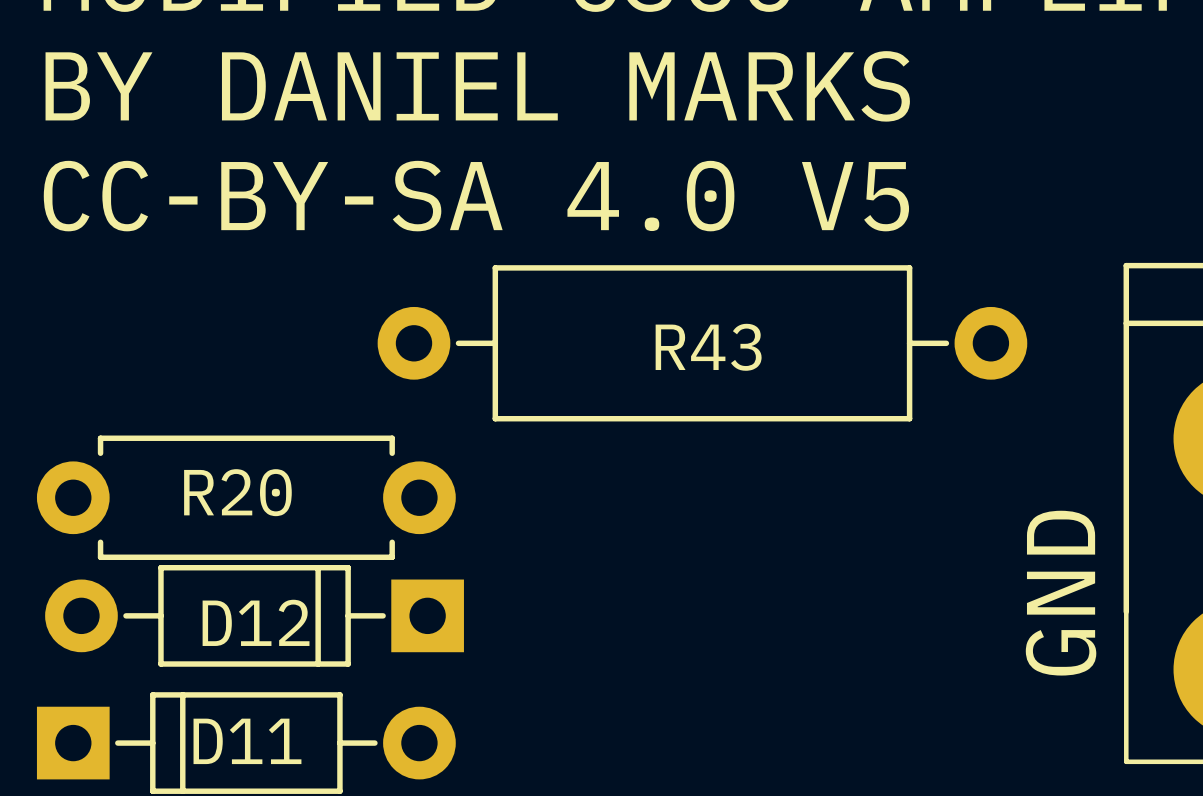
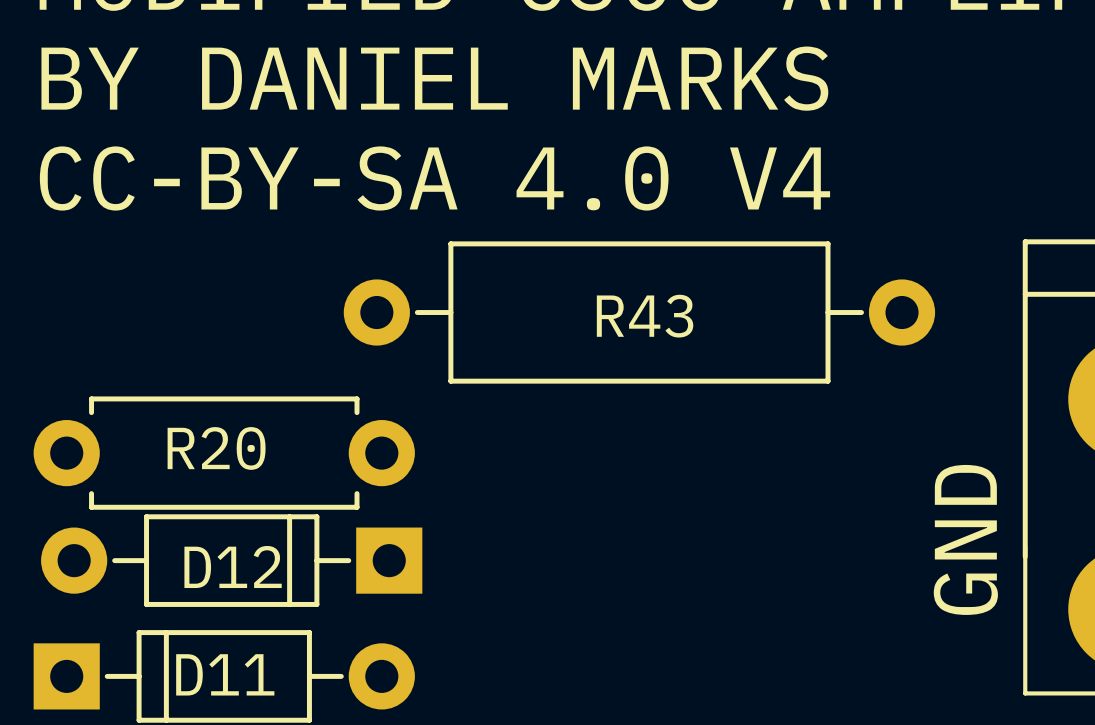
text: CC-BY-SA 4.0 V5 (476, 196) -> CC-BY-SA 4.0 V4 (434, 178)

